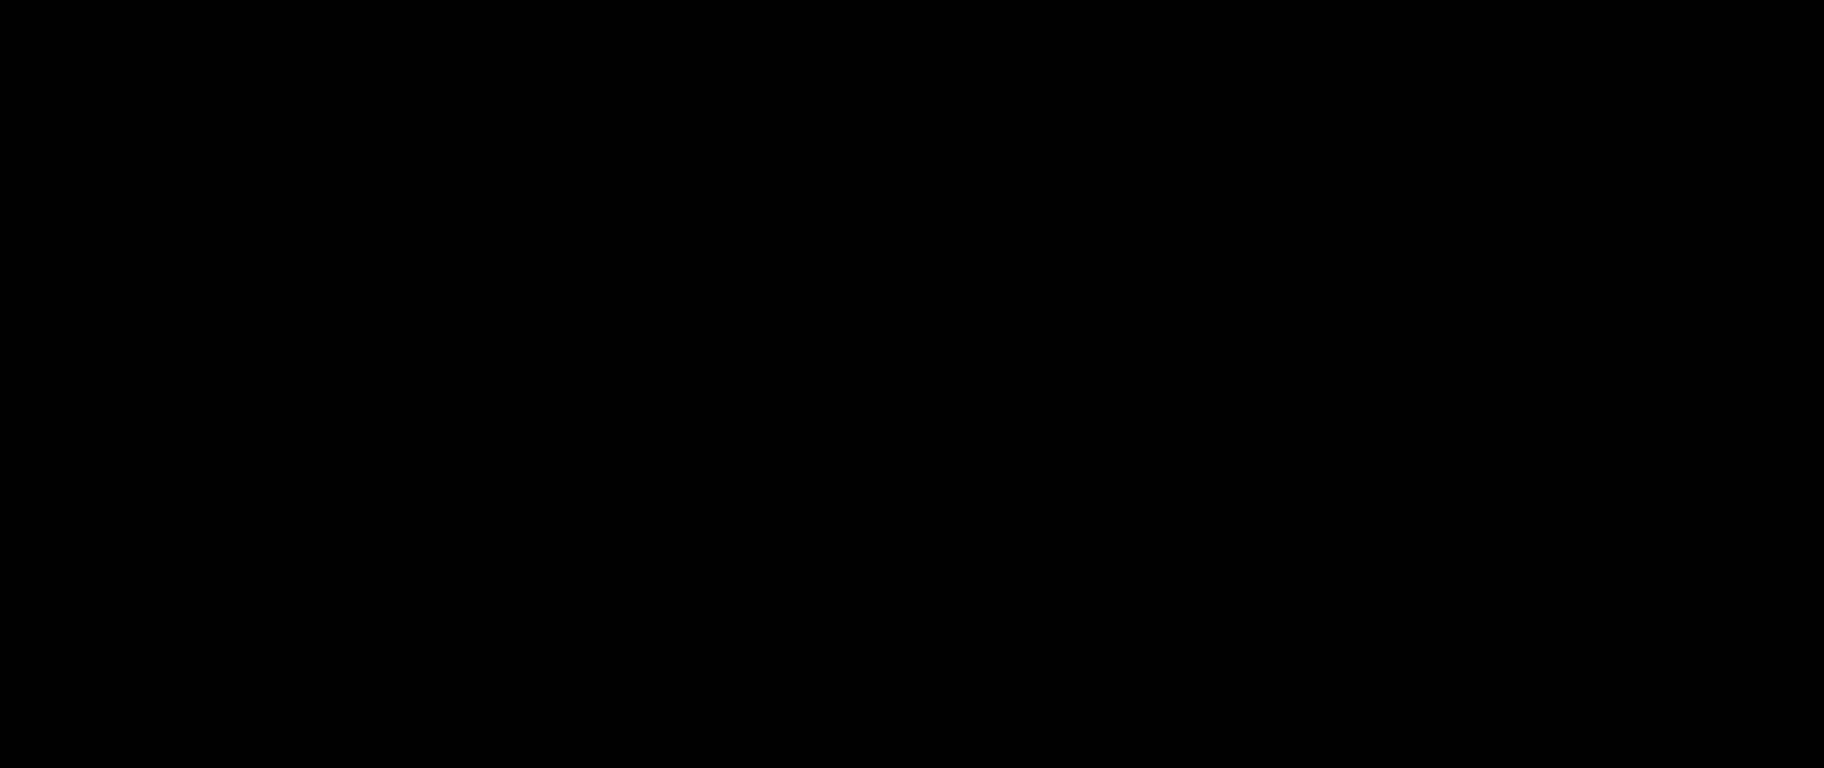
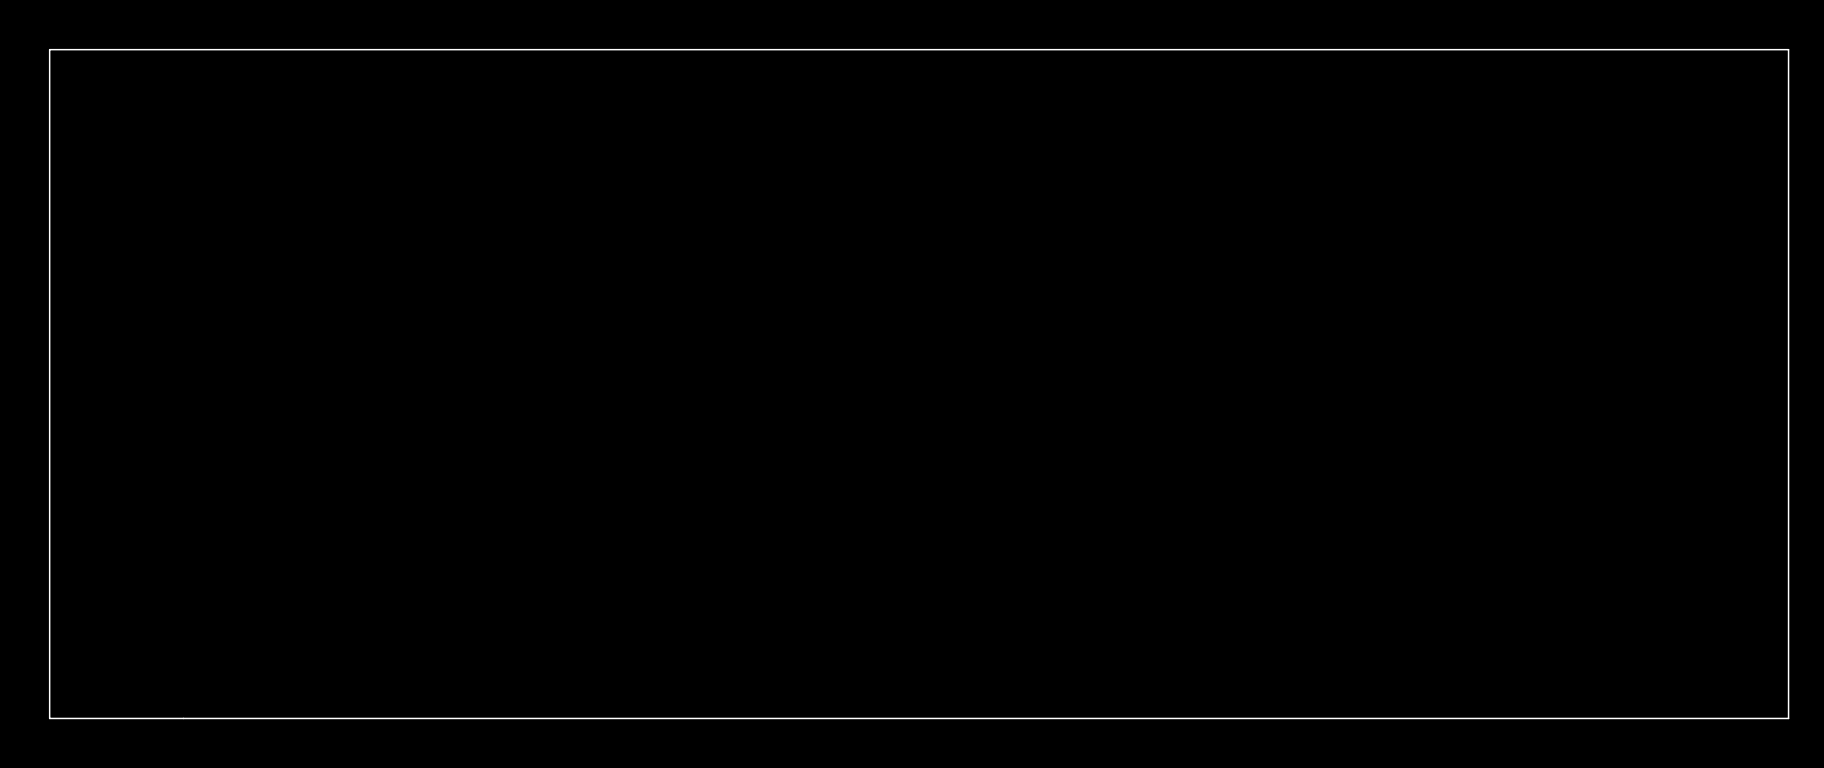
board edge: none -> (1788, 49) (49, 49) (49, 718) (1788, 718) (1788, 49)

